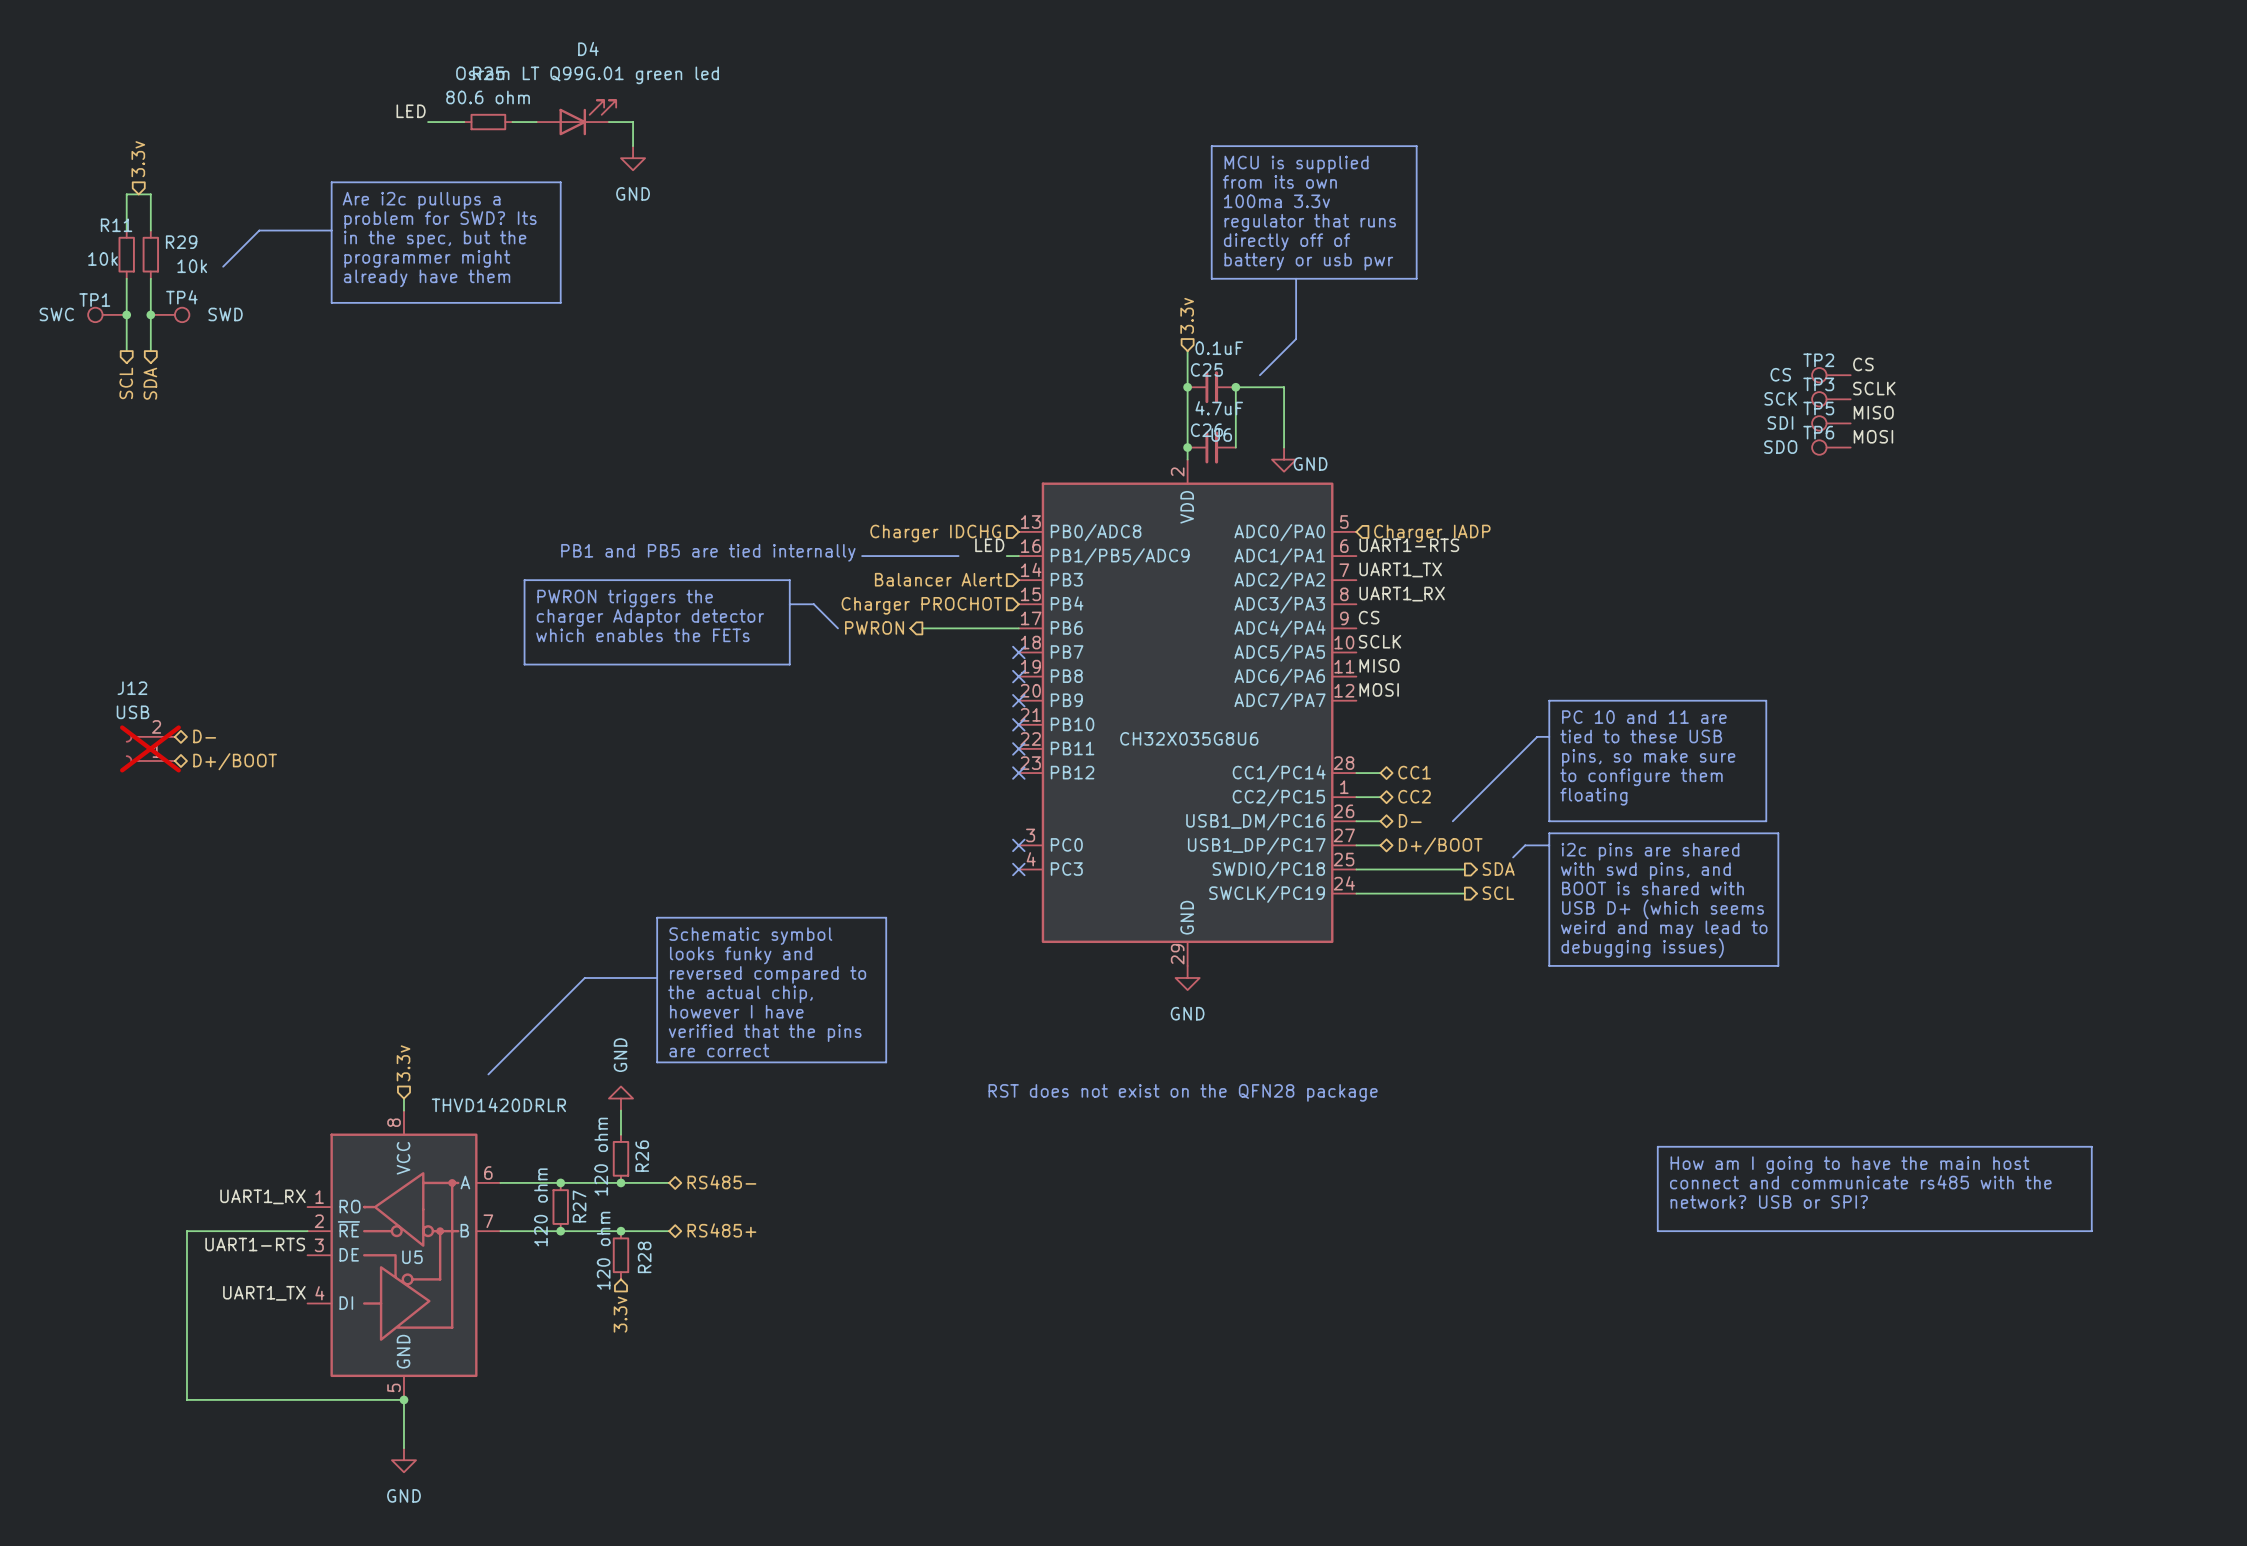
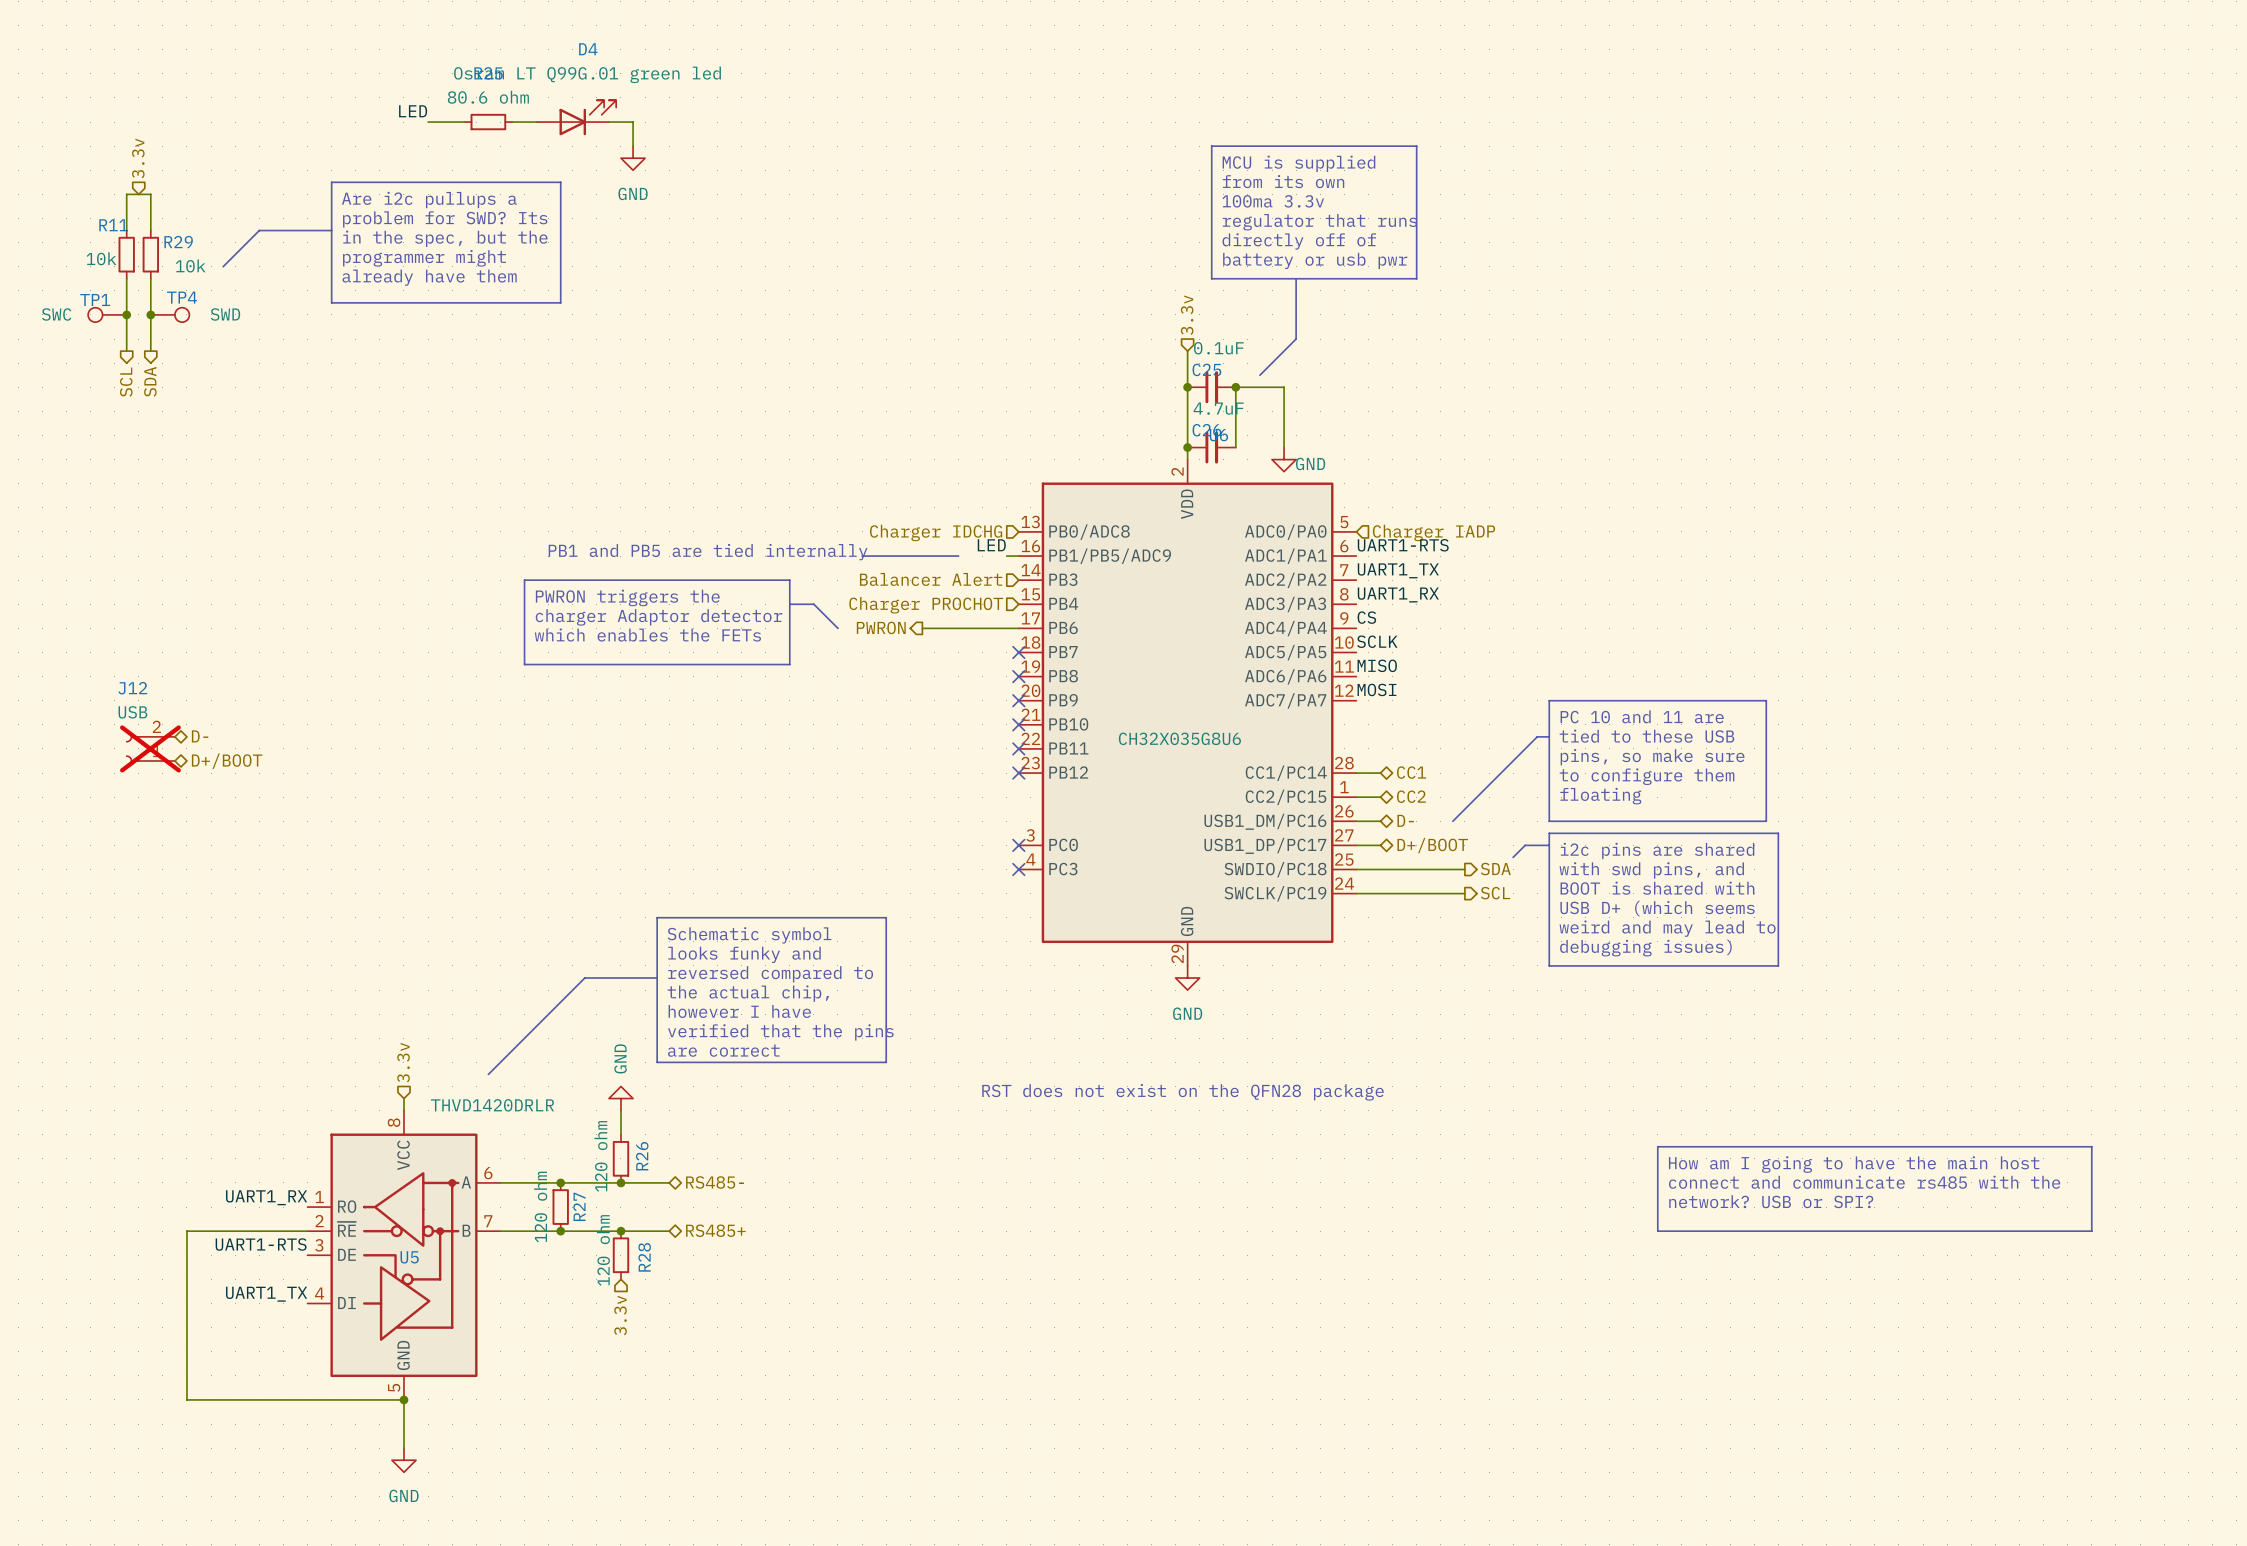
label: CS (1863, 364) -> none
TP2: CS (1831, 375) -> none
label: SCLK (1874, 388) -> none
TP3: SCK (1831, 399) -> none
label: MISO (1873, 412) -> none
TP5: SDI (1831, 423) -> none
label: MOSI (1873, 436) -> none
TP6: SDO (1831, 447) -> none

